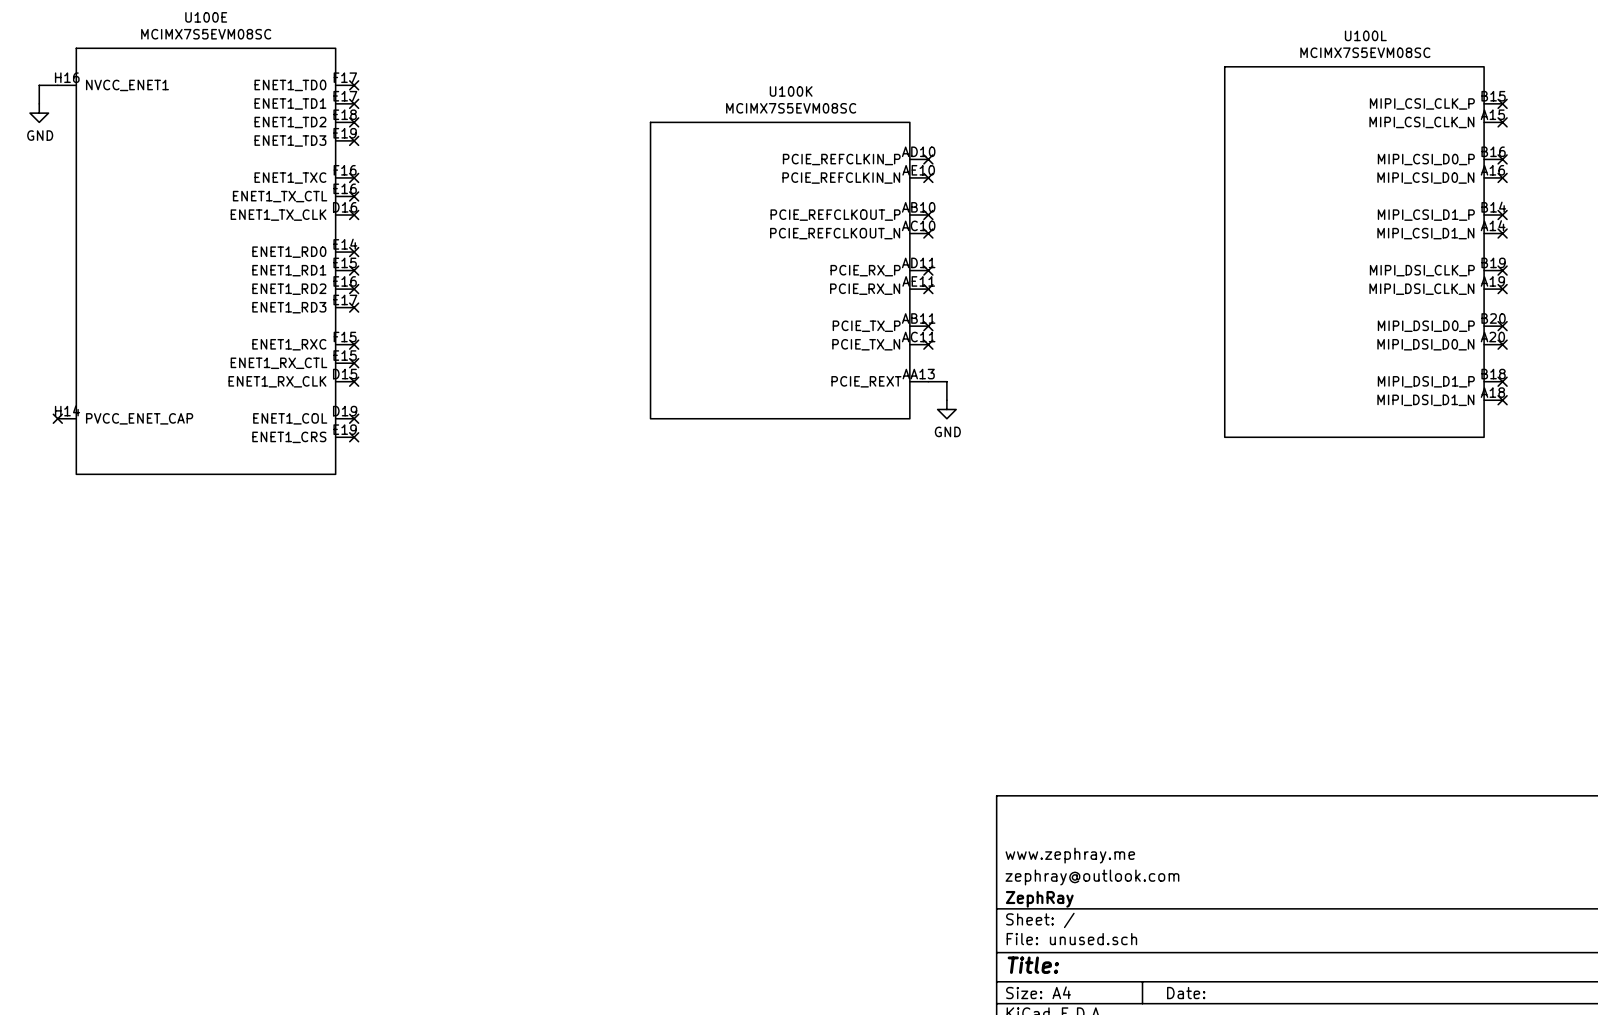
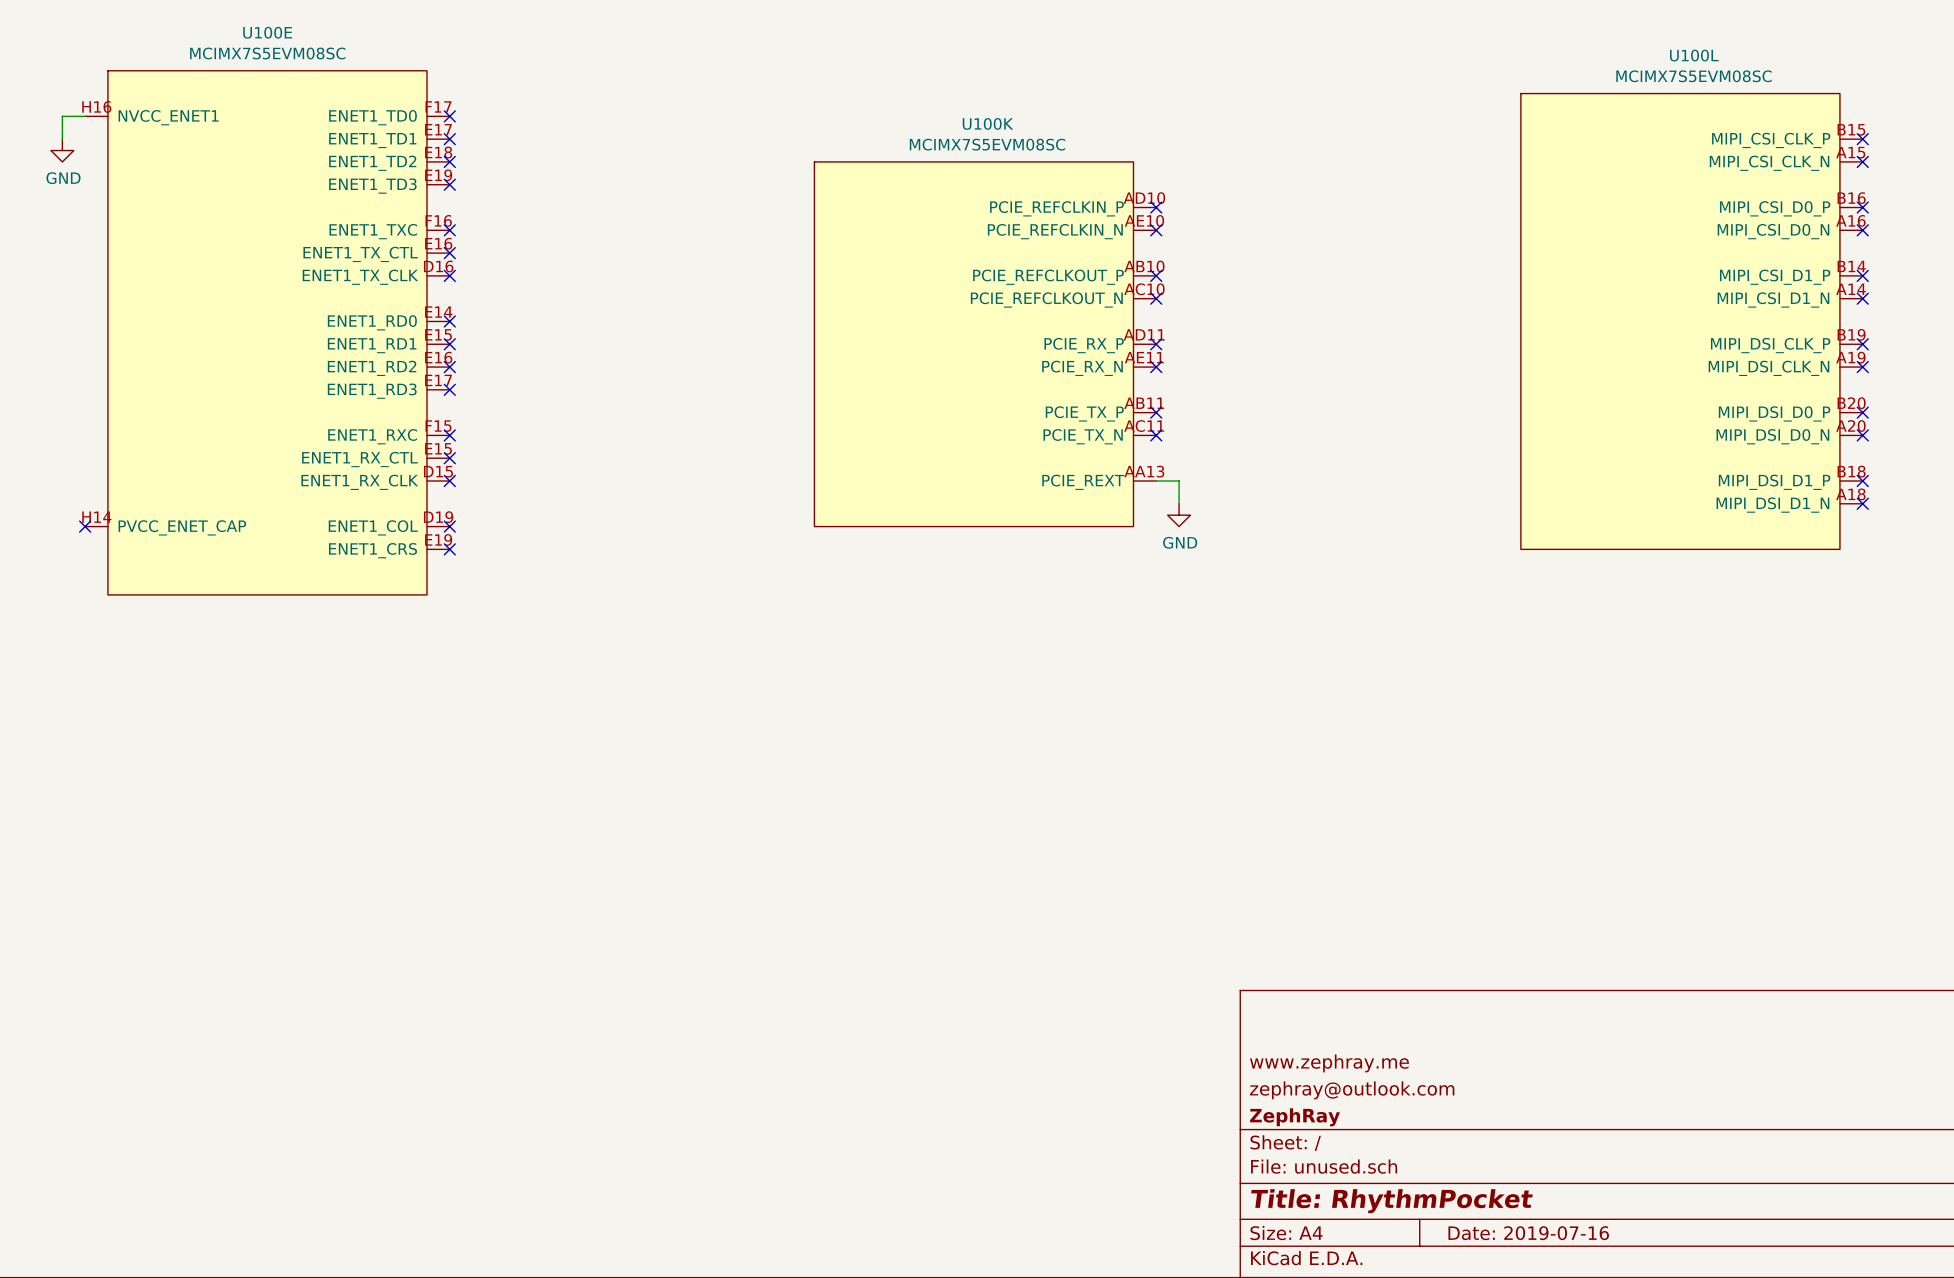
title block: Title: (1033, 965) -> Title: RhythmPocket (1391, 1201)
title block: Date: (1186, 993) -> Date: 2019-07-16 (1528, 1233)

